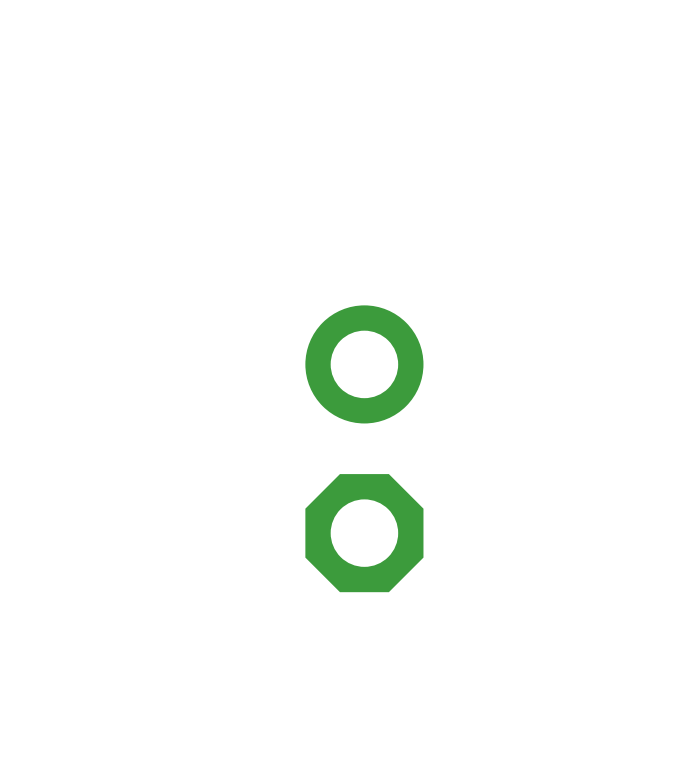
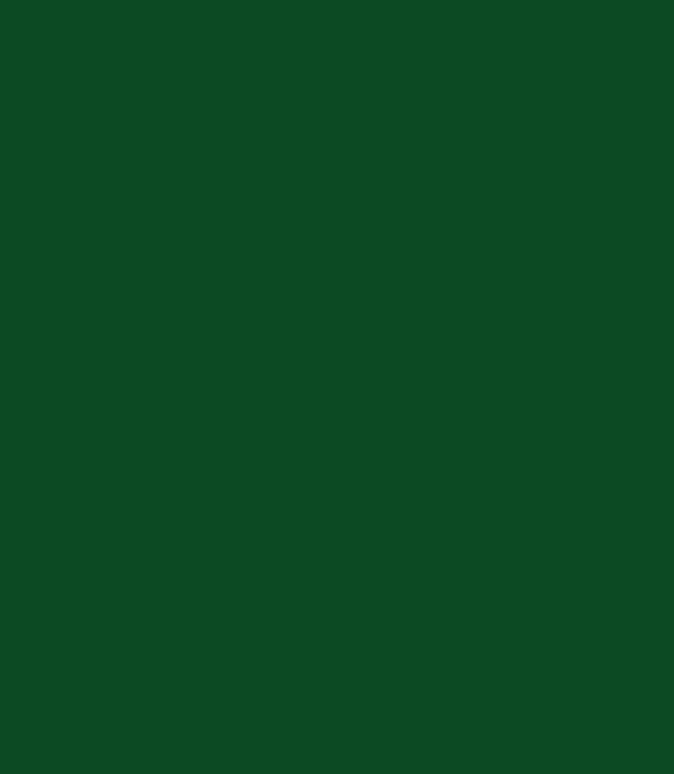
part: (364, 448) -> none

